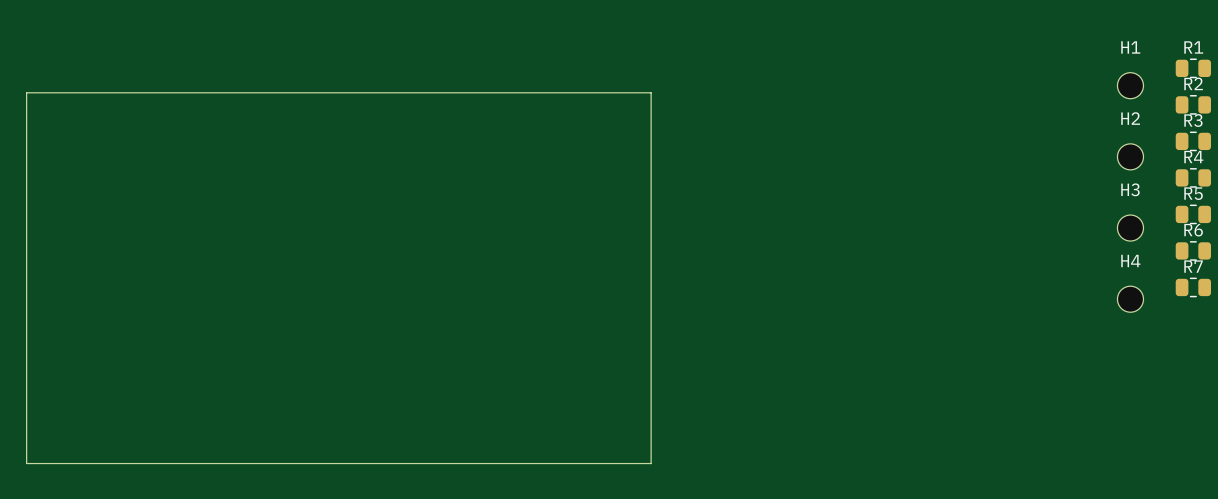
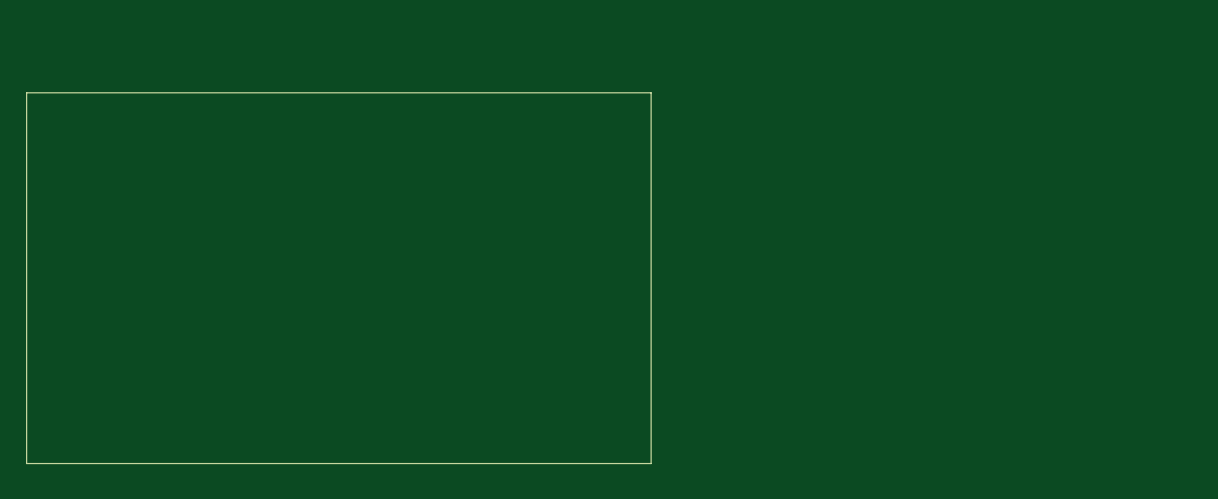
R1: (1193, 68) -> none
H1: (1130, 85) -> none
R2: (1193, 104) -> none
R3: (1193, 141) -> none
H2: (1130, 156) -> none
R4: (1193, 177) -> none
R5: (1193, 214) -> none
H3: (1130, 228) -> none
R6: (1193, 250) -> none
R7: (1193, 287) -> none
H4: (1130, 299) -> none

